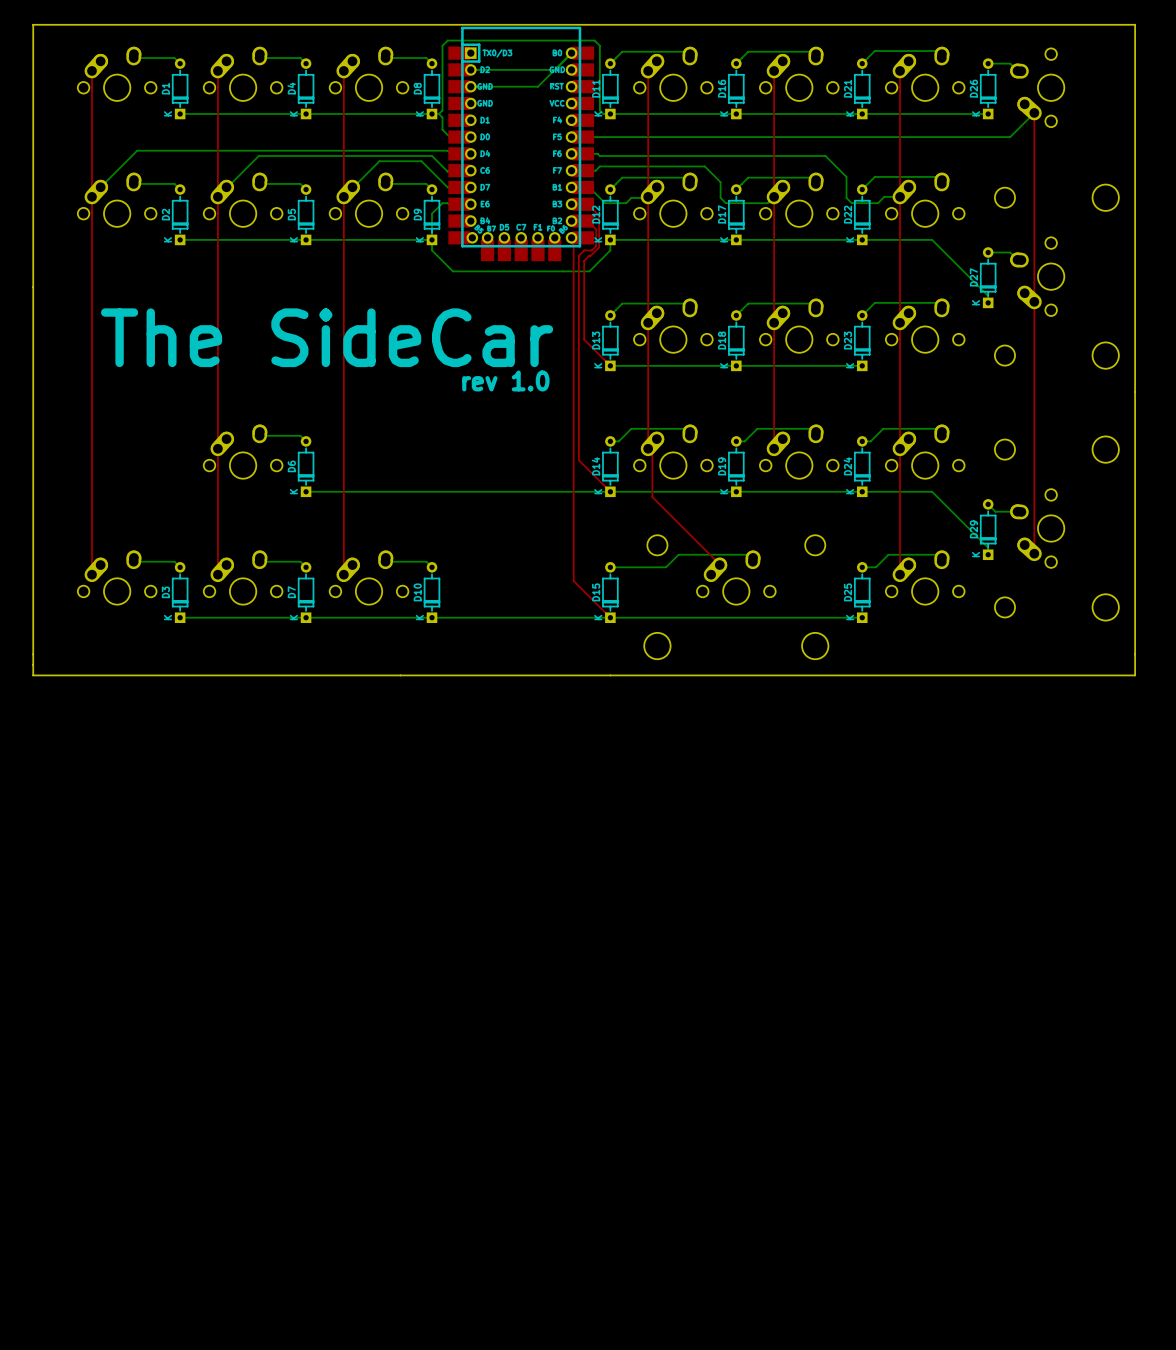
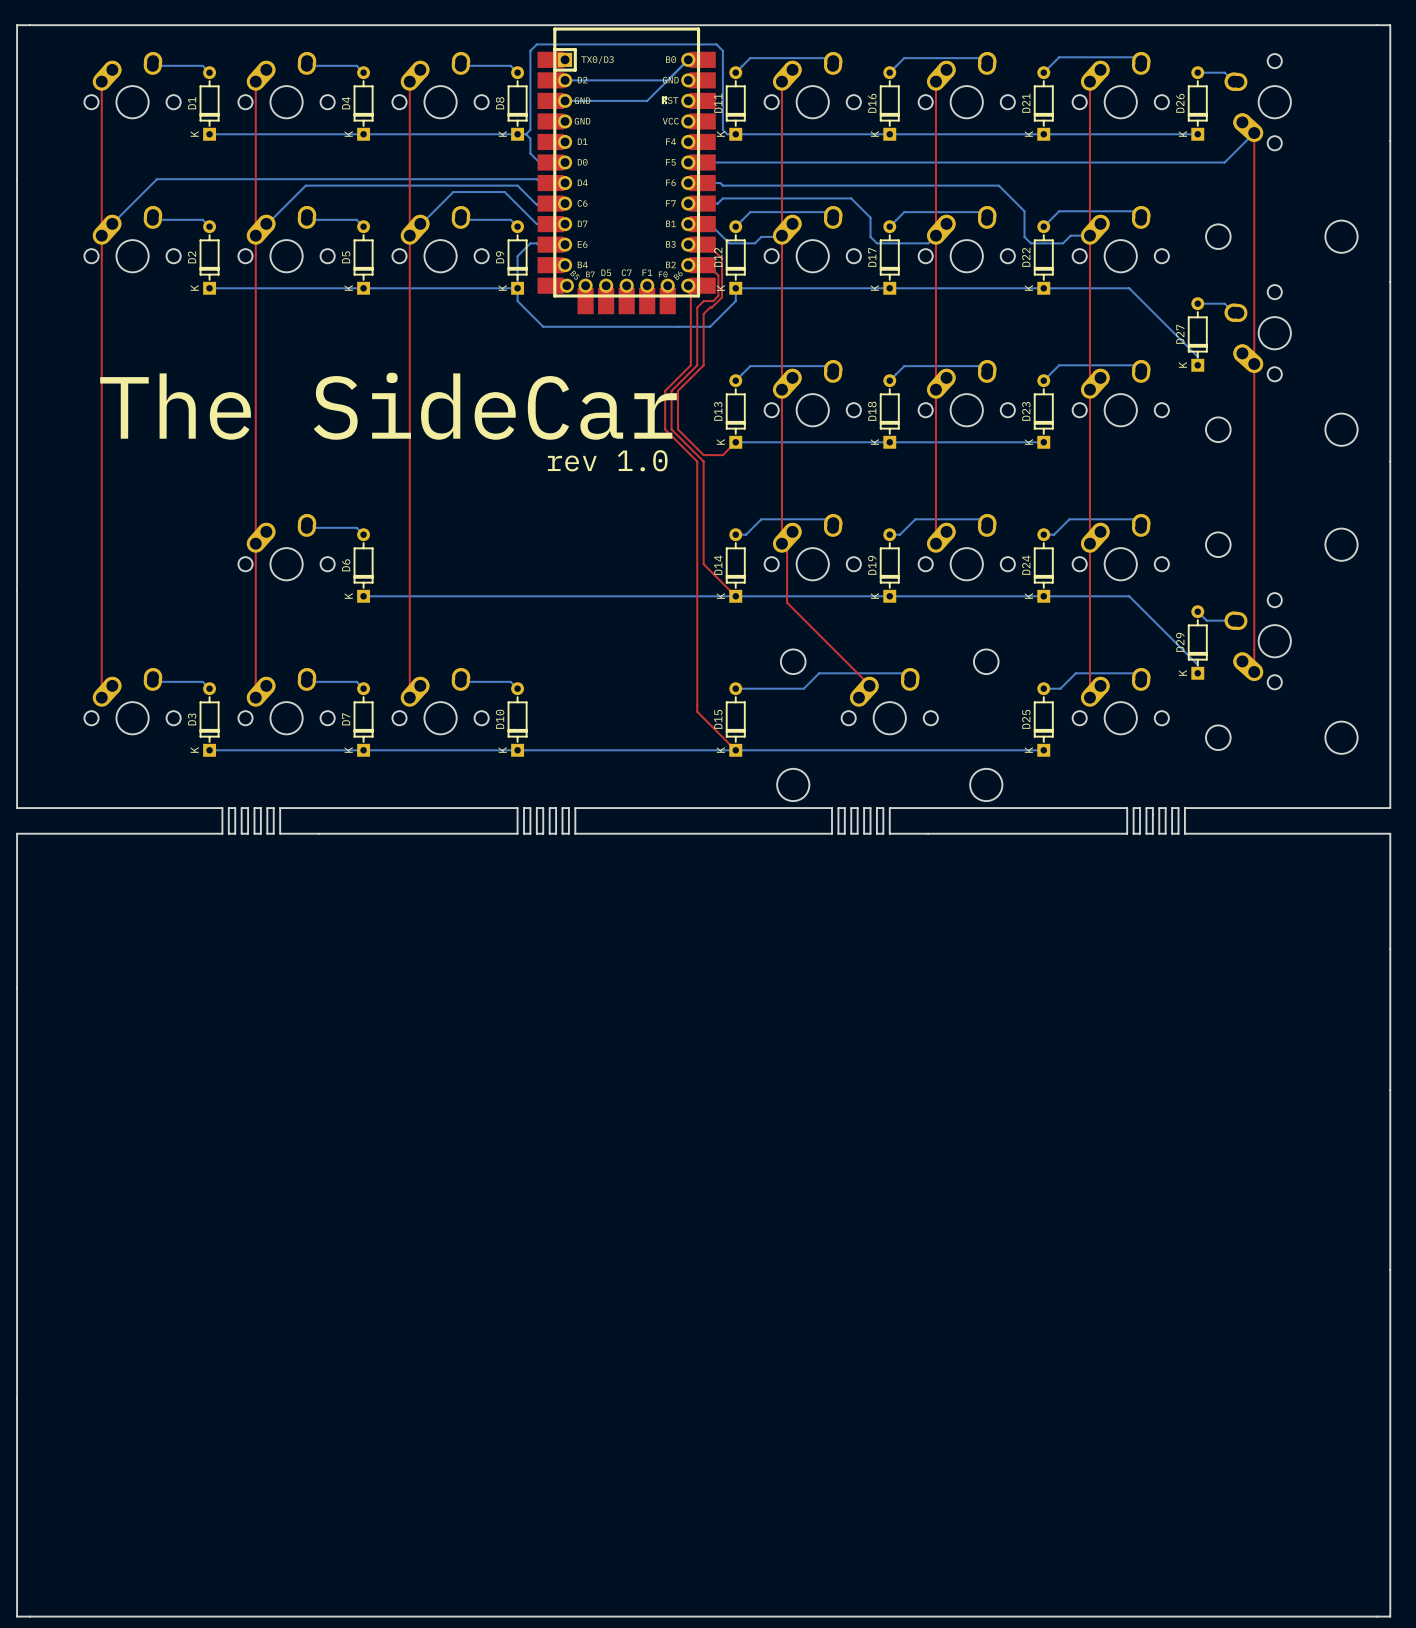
board edge: (33, 24) (33, 675) (1135, 675) (1135, 24) -> (29, 25) (17, 25) (17, 808) (222, 808) (222, 833) (17, 833) (17, 1616) (1390, 1616) (1390, 833) (1184, 833) (1184, 808) (1390, 808) (1390, 25) (1377, 25)
top track: (573, 302) (573, 580) (578, 586) -> none
top track: (578, 302) (578, 381) -> (690, 365) (665, 390) (665, 429) (697, 461)
top track: none -> (697, 365) (671, 390) (671, 429) (703, 461) (703, 564)
top track: (584, 302) (584, 339) (610, 365) -> (703, 365) (678, 390) (678, 429) (703, 455) (722, 455) (735, 442)
top track: (578, 460) (584, 465) -> (697, 557) (697, 711)
board edge: none -> (228, 808) (235, 808) (235, 833) (228, 833) (228, 808)
board edge: none -> (241, 808) (248, 808) (248, 833) (241, 833) (241, 808)
board edge: none -> (254, 808) (260, 808) (260, 833) (254, 833) (254, 808)
board edge: none -> (267, 808) (273, 808) (273, 833) (267, 833) (267, 808)
board edge: none -> (280, 808) (517, 808) (517, 833) (280, 833) (280, 808)
board edge: none -> (523, 808) (530, 808) (530, 833) (523, 833) (523, 808)
board edge: none -> (536, 808) (543, 808) (543, 833) (536, 833) (536, 808)
board edge: none -> (549, 808) (556, 808) (556, 833) (549, 833) (549, 808)
board edge: none -> (562, 808) (568, 808) (568, 833) (562, 833) (562, 808)
board edge: none -> (575, 808) (832, 808) (832, 833) (575, 833) (575, 808)
board edge: none -> (838, 808) (844, 808) (844, 833) (838, 833) (838, 808)
board edge: none -> (851, 808) (857, 808) (857, 833) (851, 833) (851, 808)
board edge: none -> (864, 808) (870, 808) (870, 833) (864, 833) (864, 808)
board edge: none -> (876, 808) (883, 808) (883, 833) (876, 833) (876, 808)
board edge: none -> (889, 808) (1127, 808) (1127, 833) (889, 833) (889, 808)
board edge: none -> (1133, 808) (1140, 808) (1140, 833) (1133, 833) (1133, 808)
board edge: none -> (1146, 808) (1152, 808) (1152, 833) (1146, 833) (1146, 808)
board edge: none -> (1159, 808) (1165, 808) (1165, 833) (1159, 833) (1159, 808)
board edge: none -> (1172, 808) (1178, 808) (1178, 833) (1172, 833) (1172, 808)

